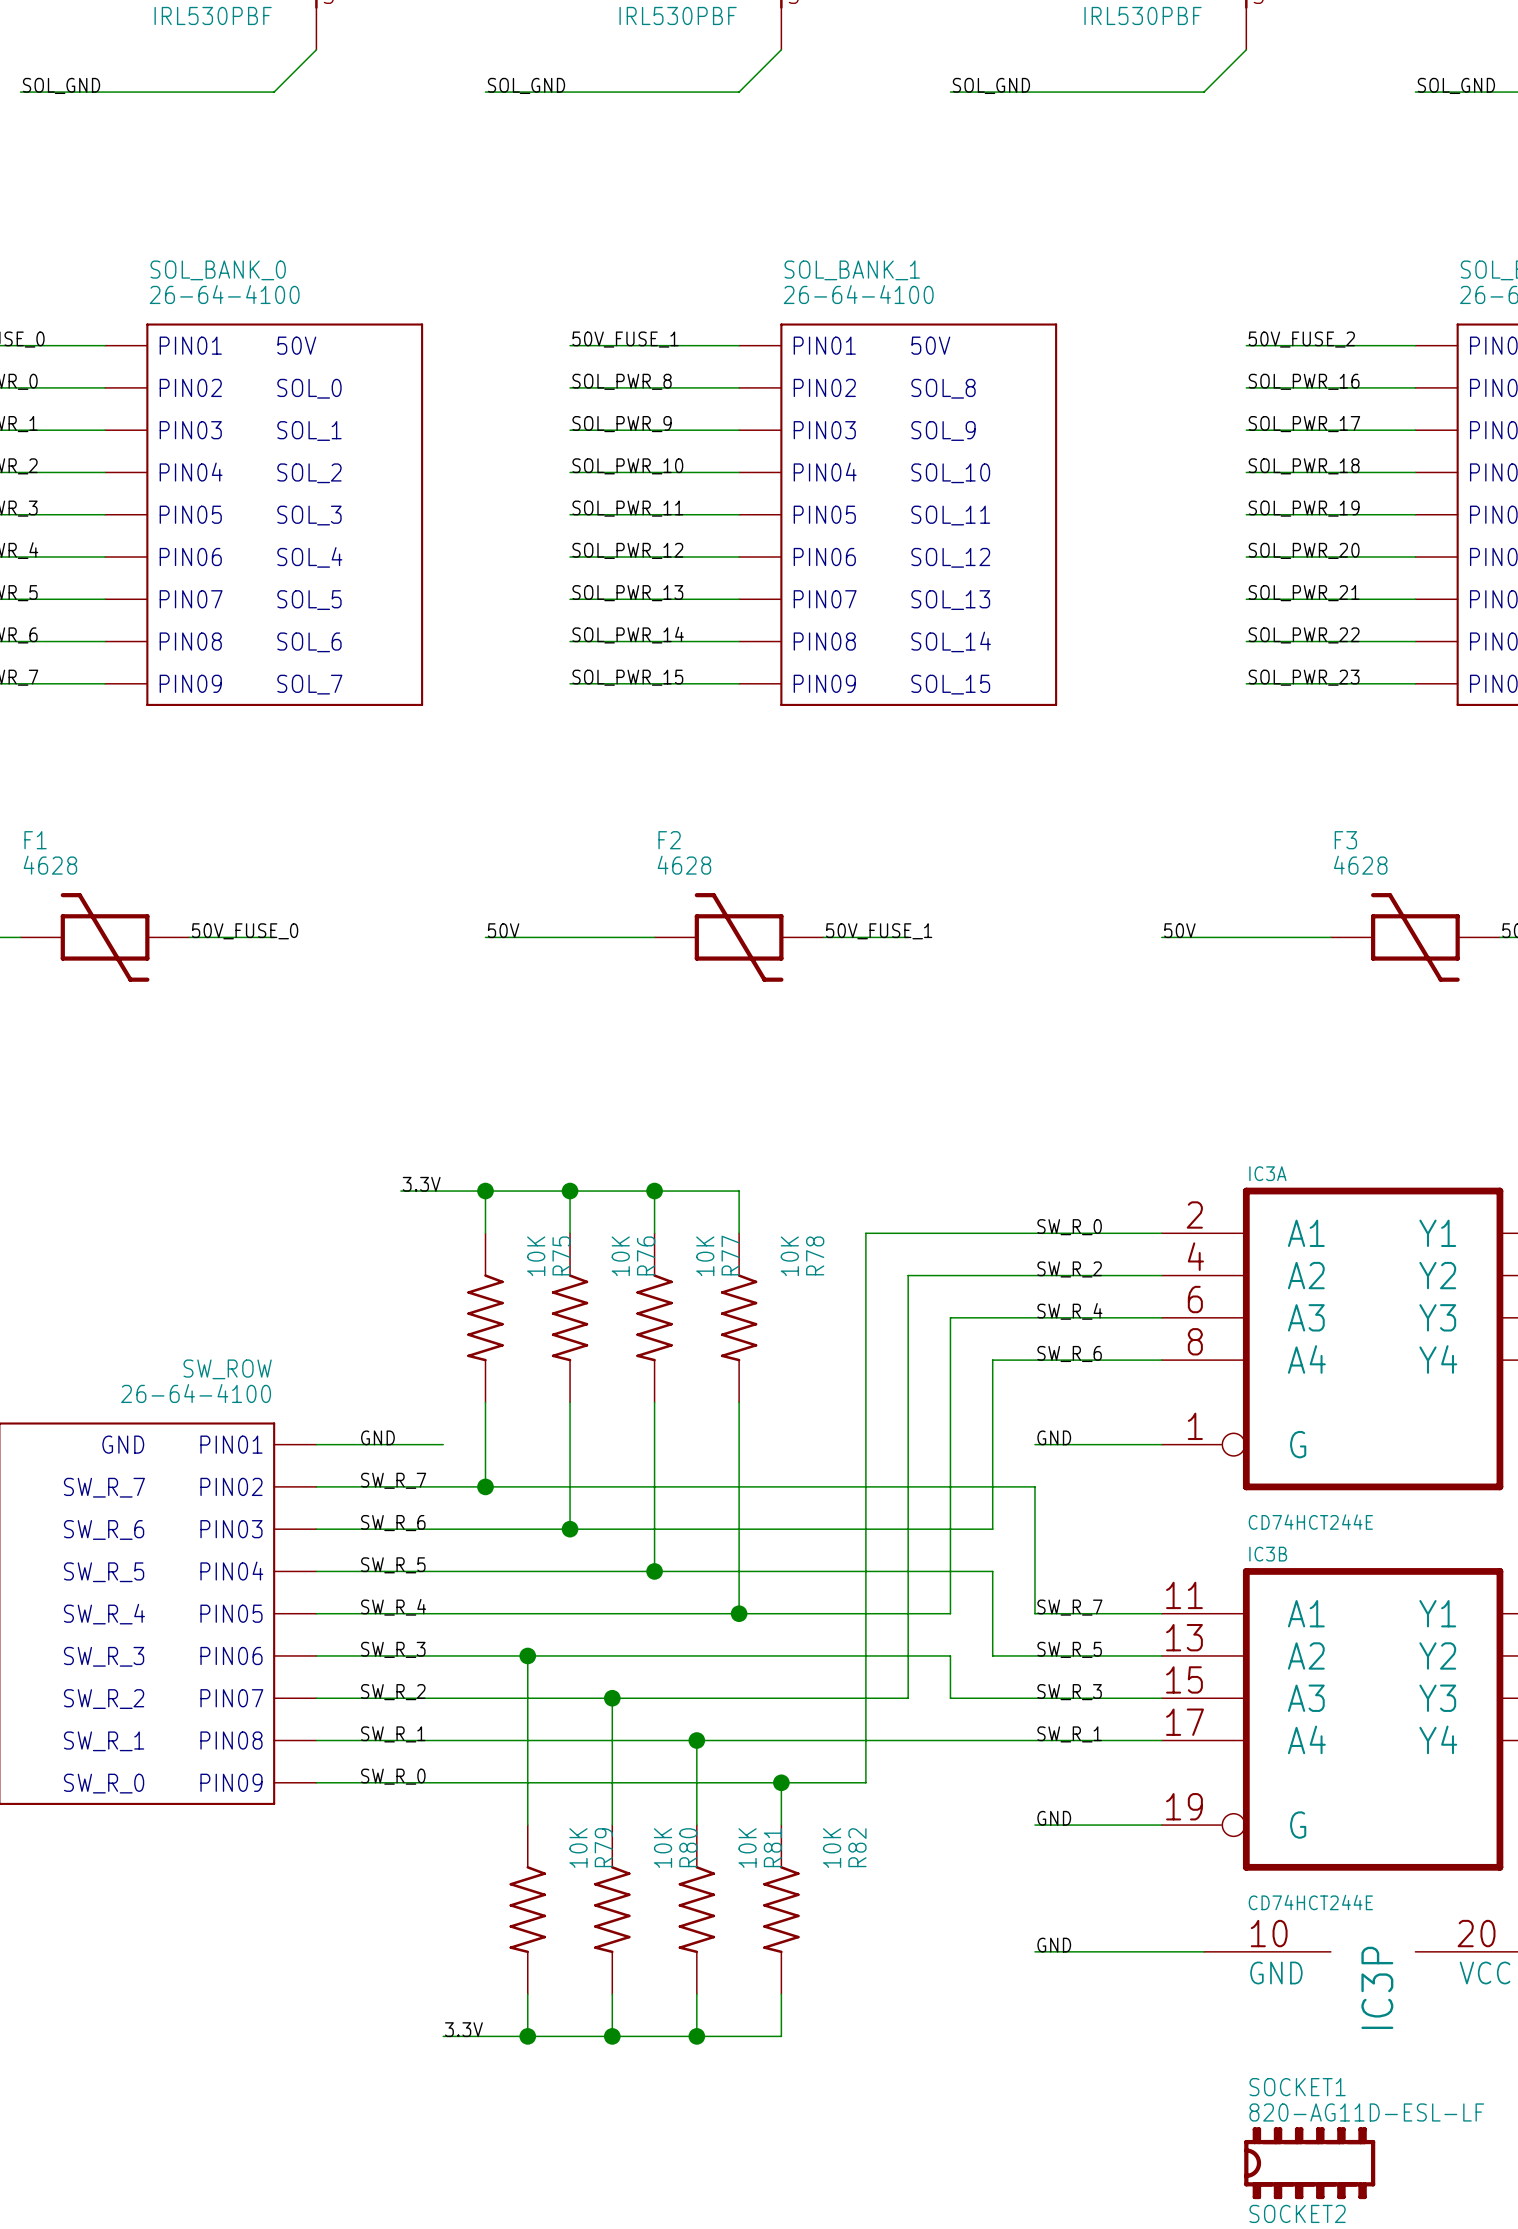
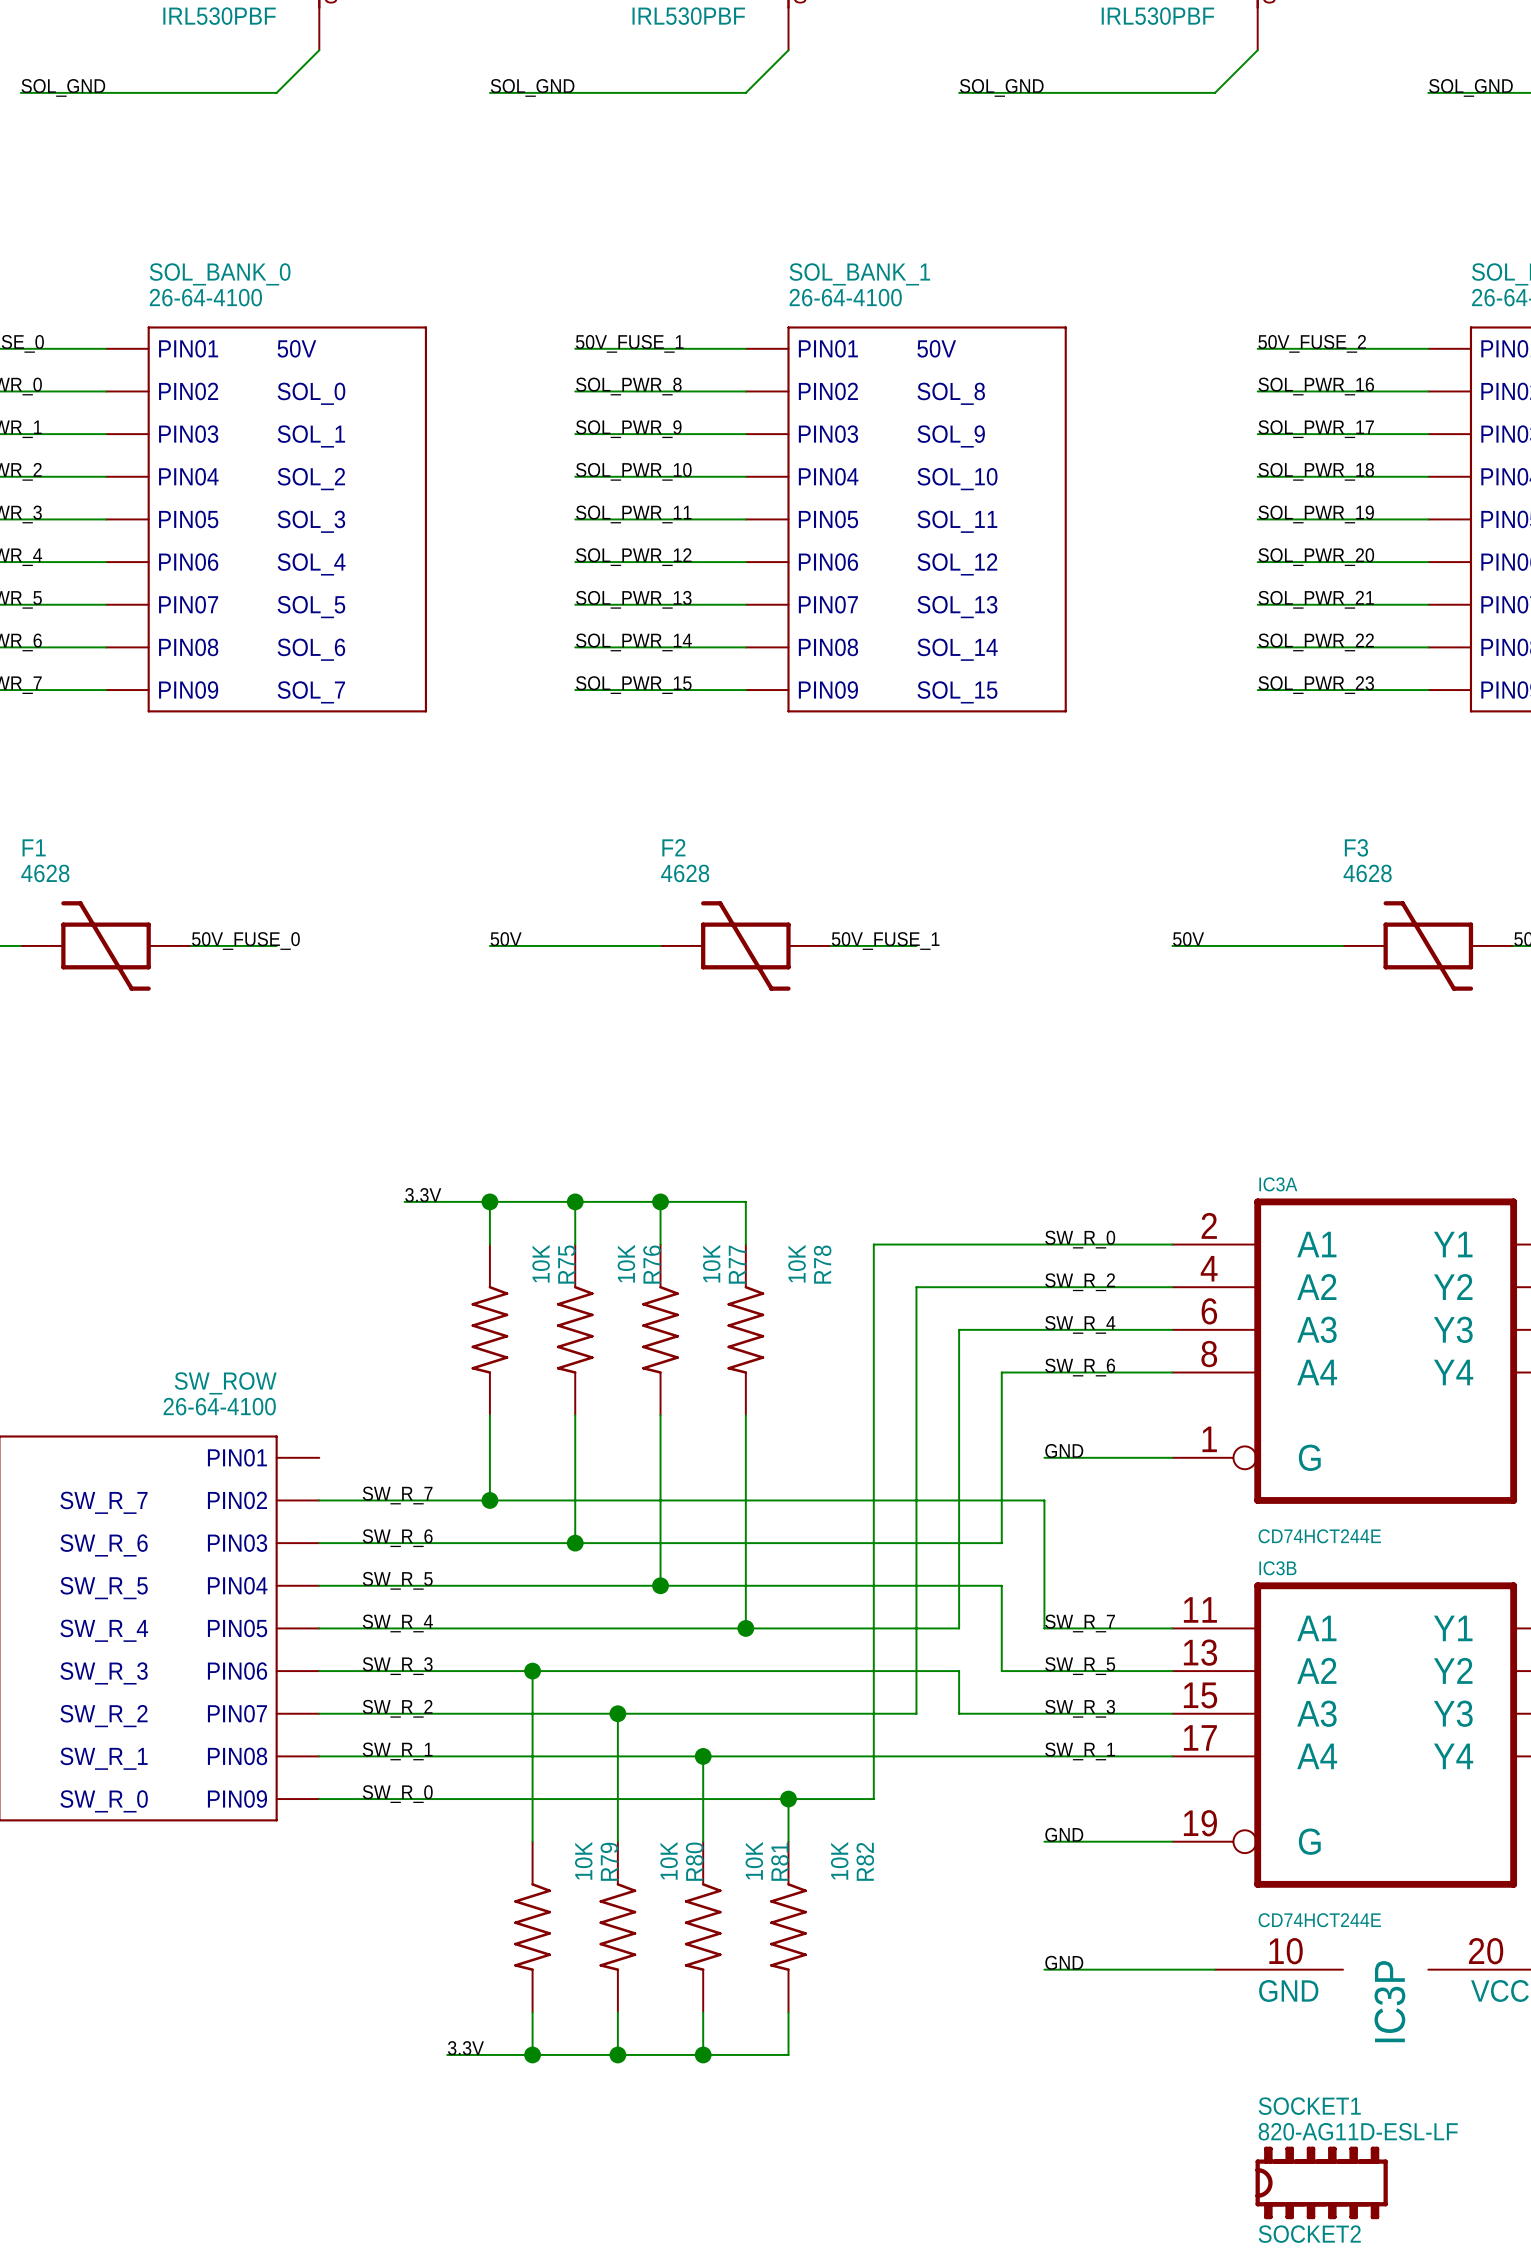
label: GND (377, 1437) -> none
SW_ROW text: GND (123, 1444) -> none
wire: (316, 1444) (443, 1444) -> none

